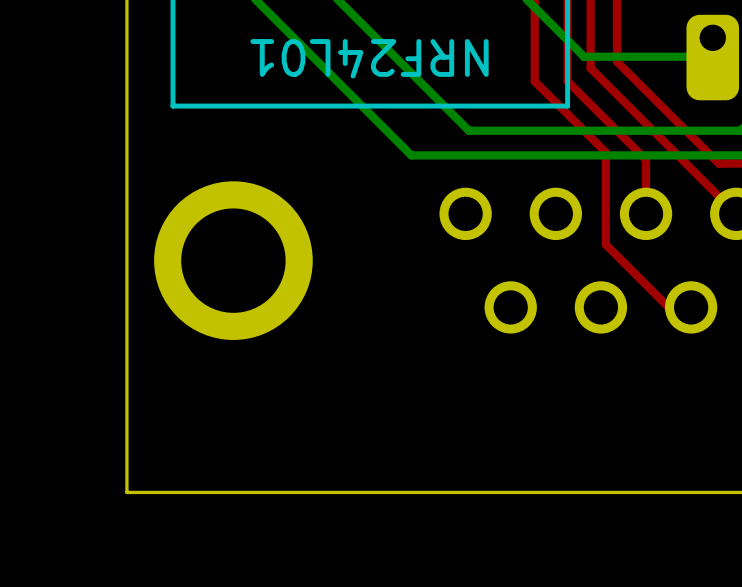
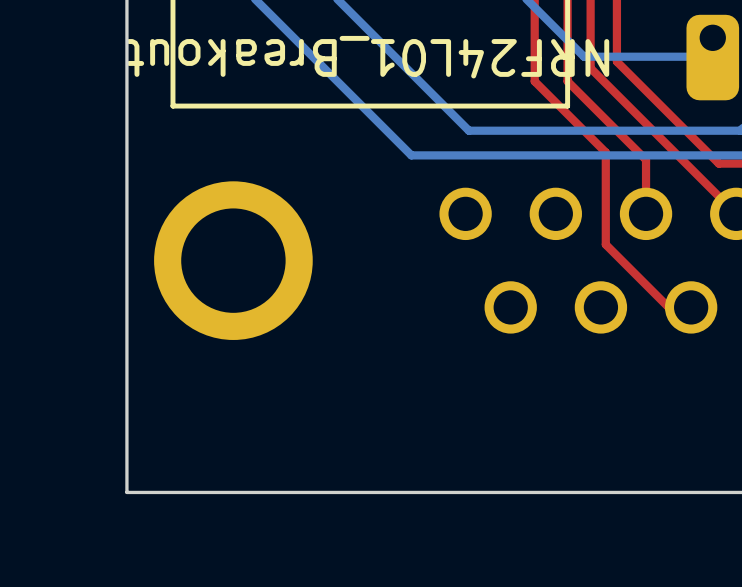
part value: NRF24L01 (369, 58) -> NRF24L01_Breakout (367, 57)

